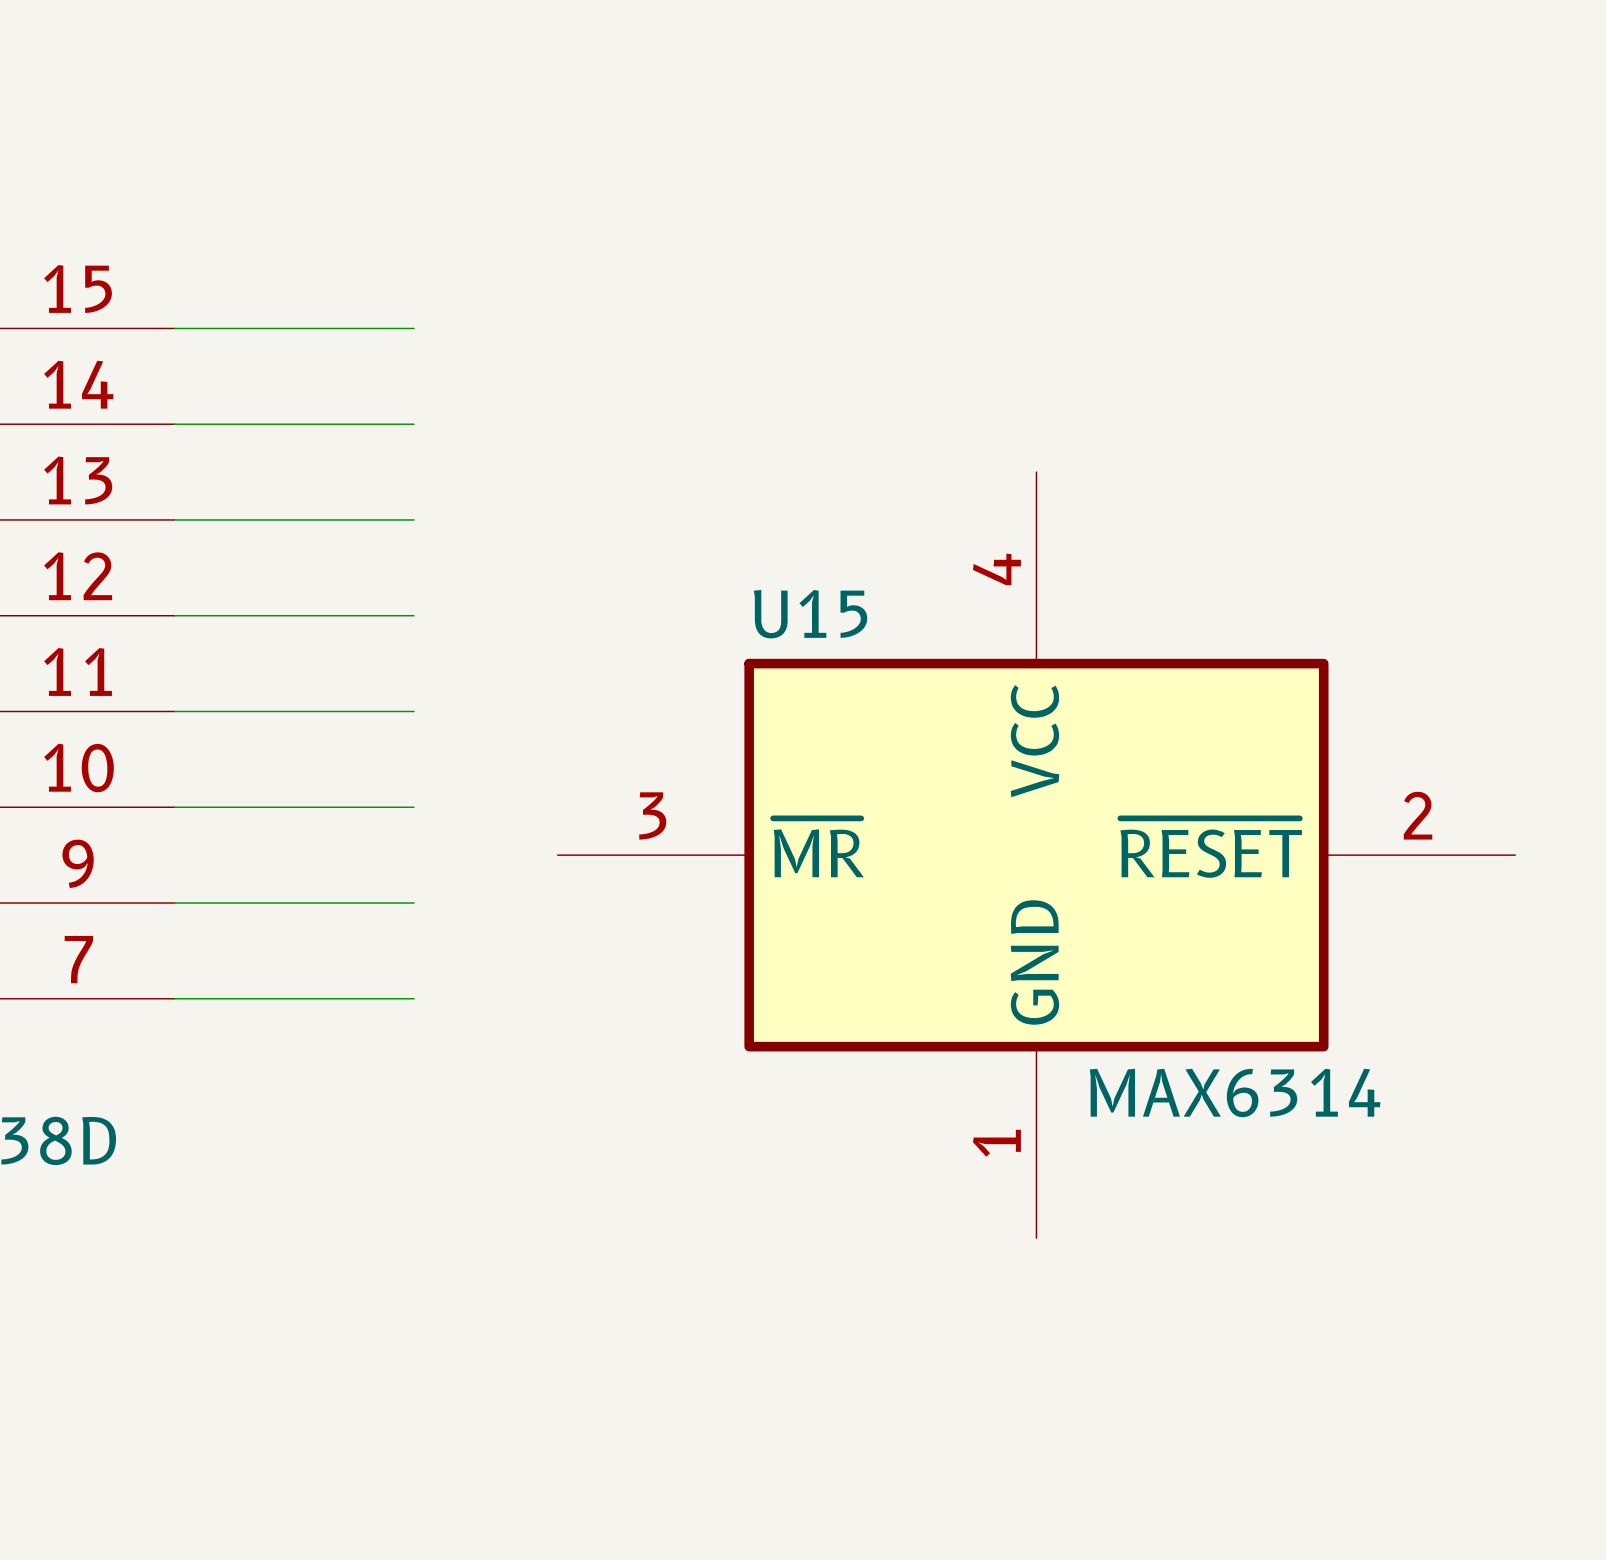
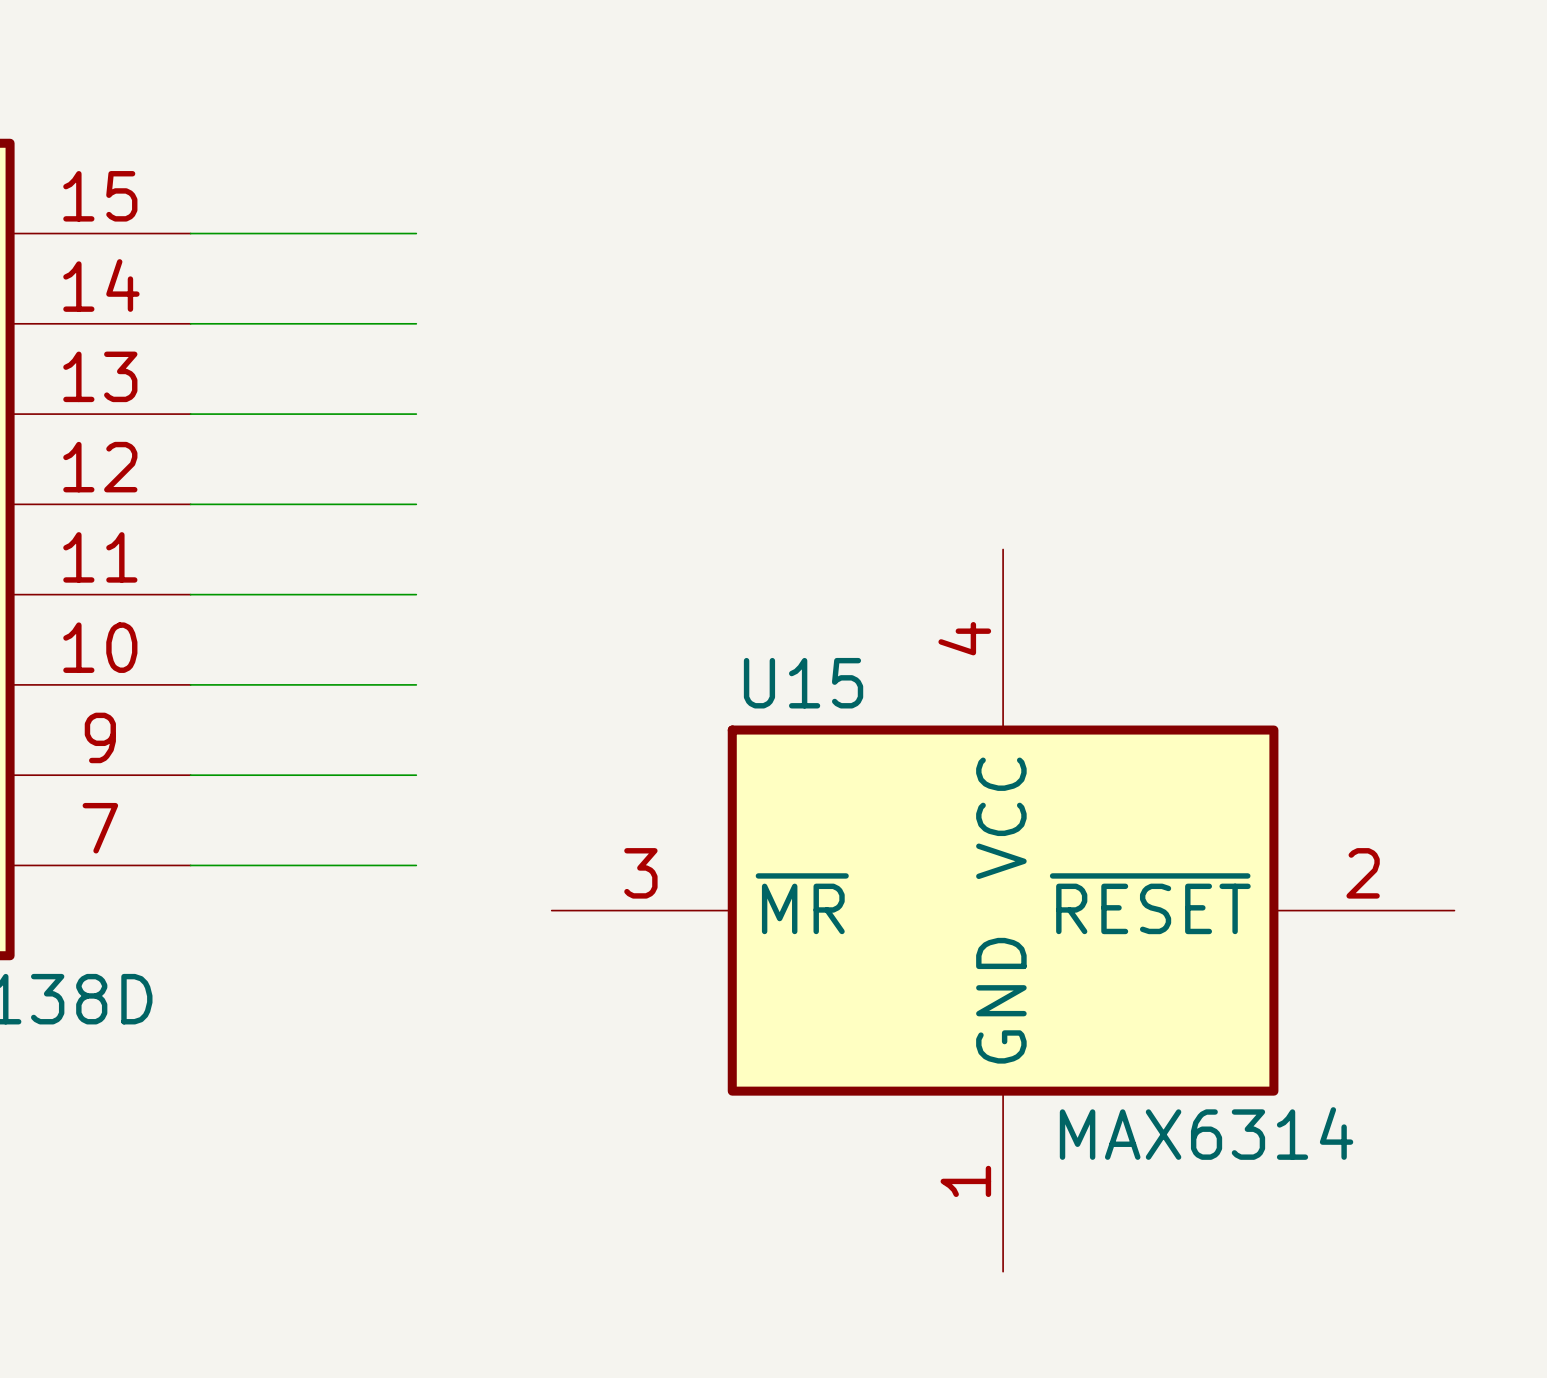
U15 position: (1036, 855) -> (1003, 910)

